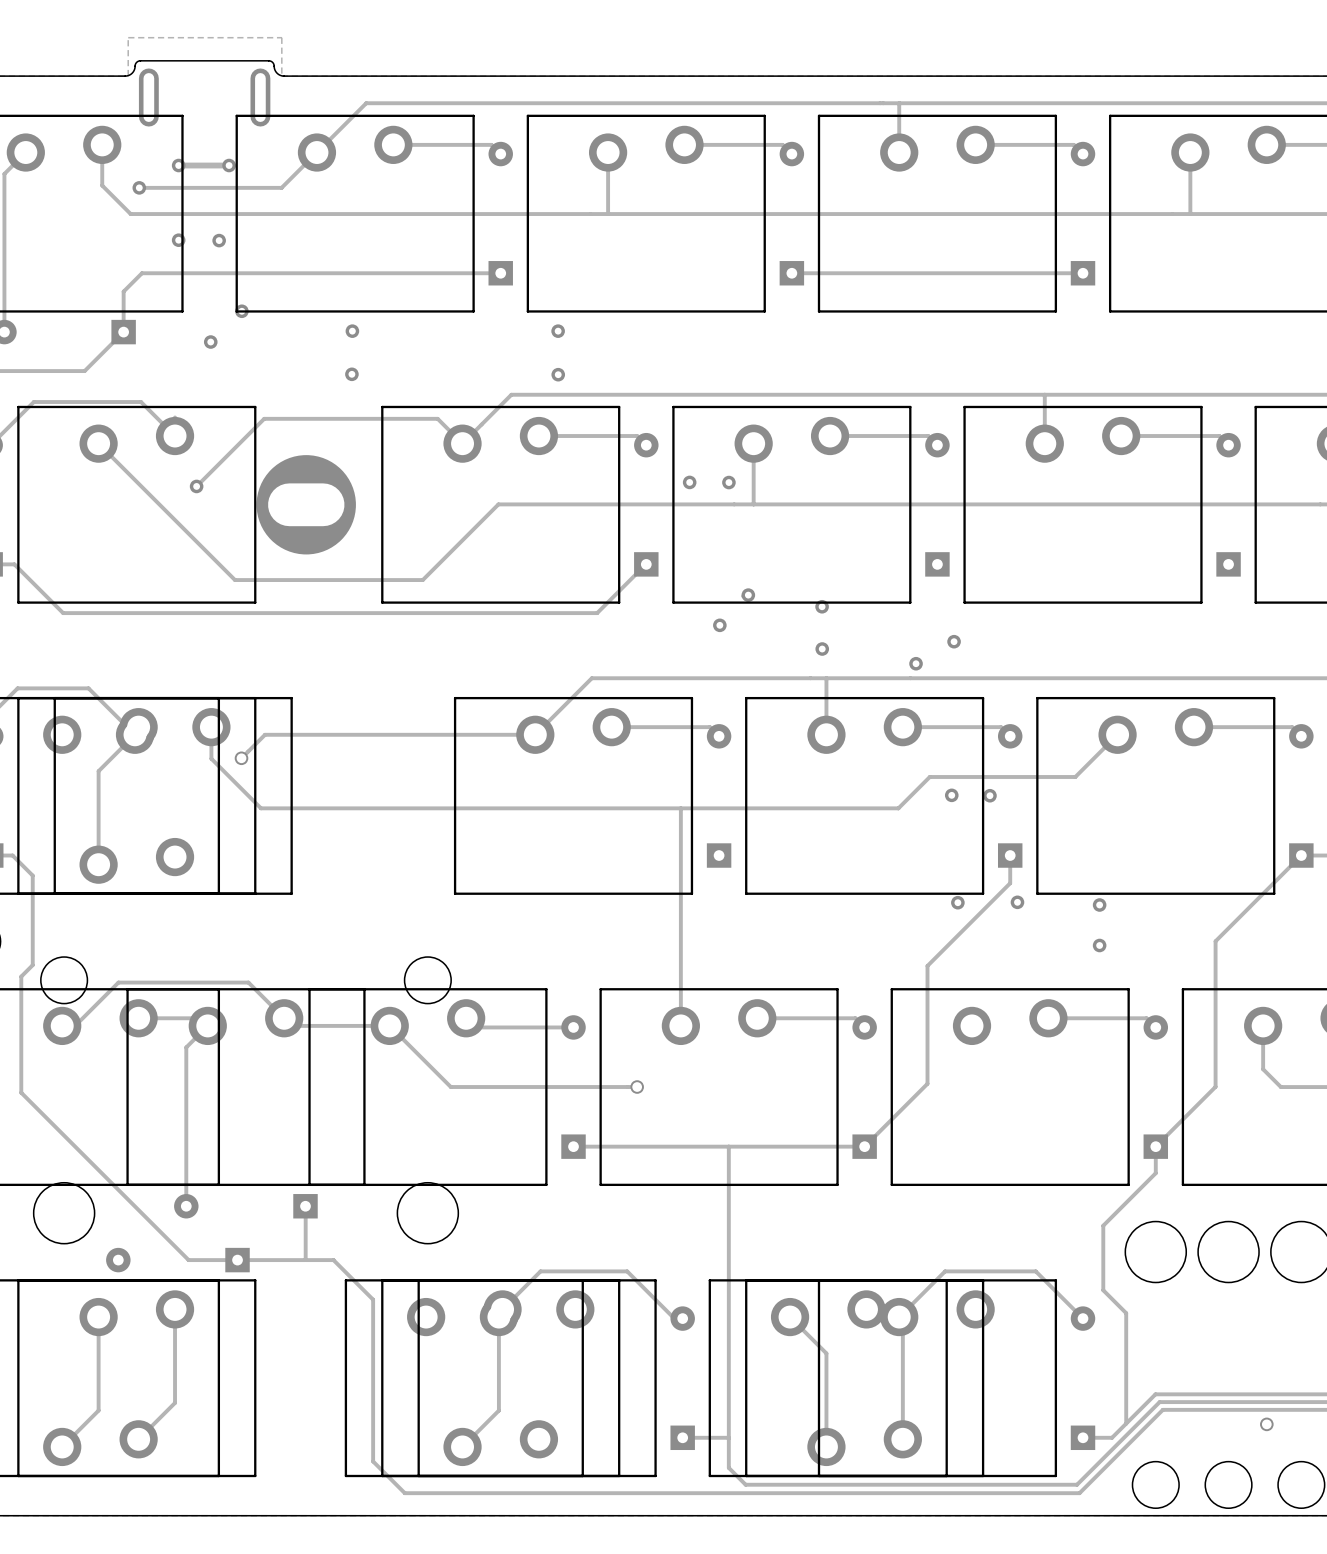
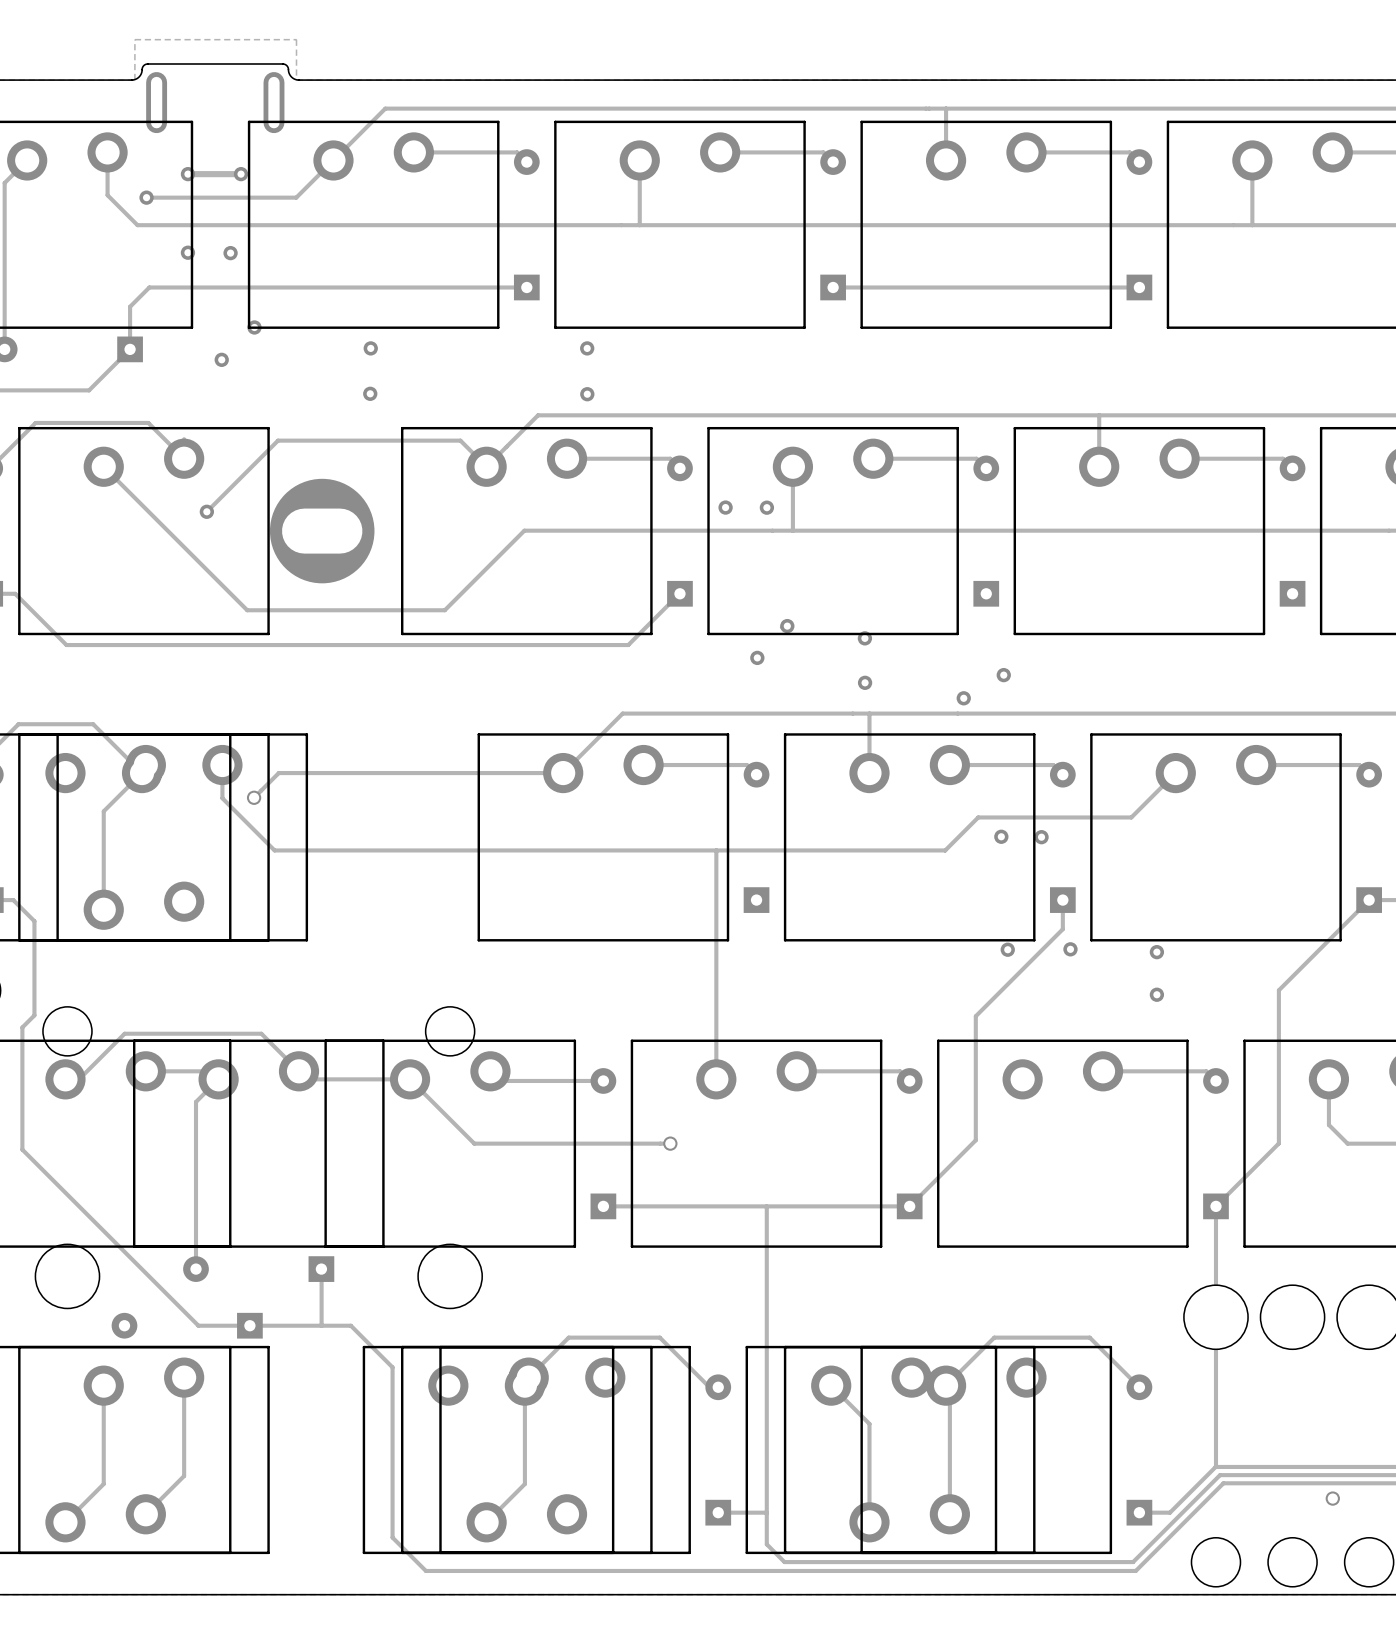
track: (1155, 1173) (1103, 1225) (1103, 1290) (1126, 1313) (1126, 1423) -> (1215, 1234) (1215, 1466)

